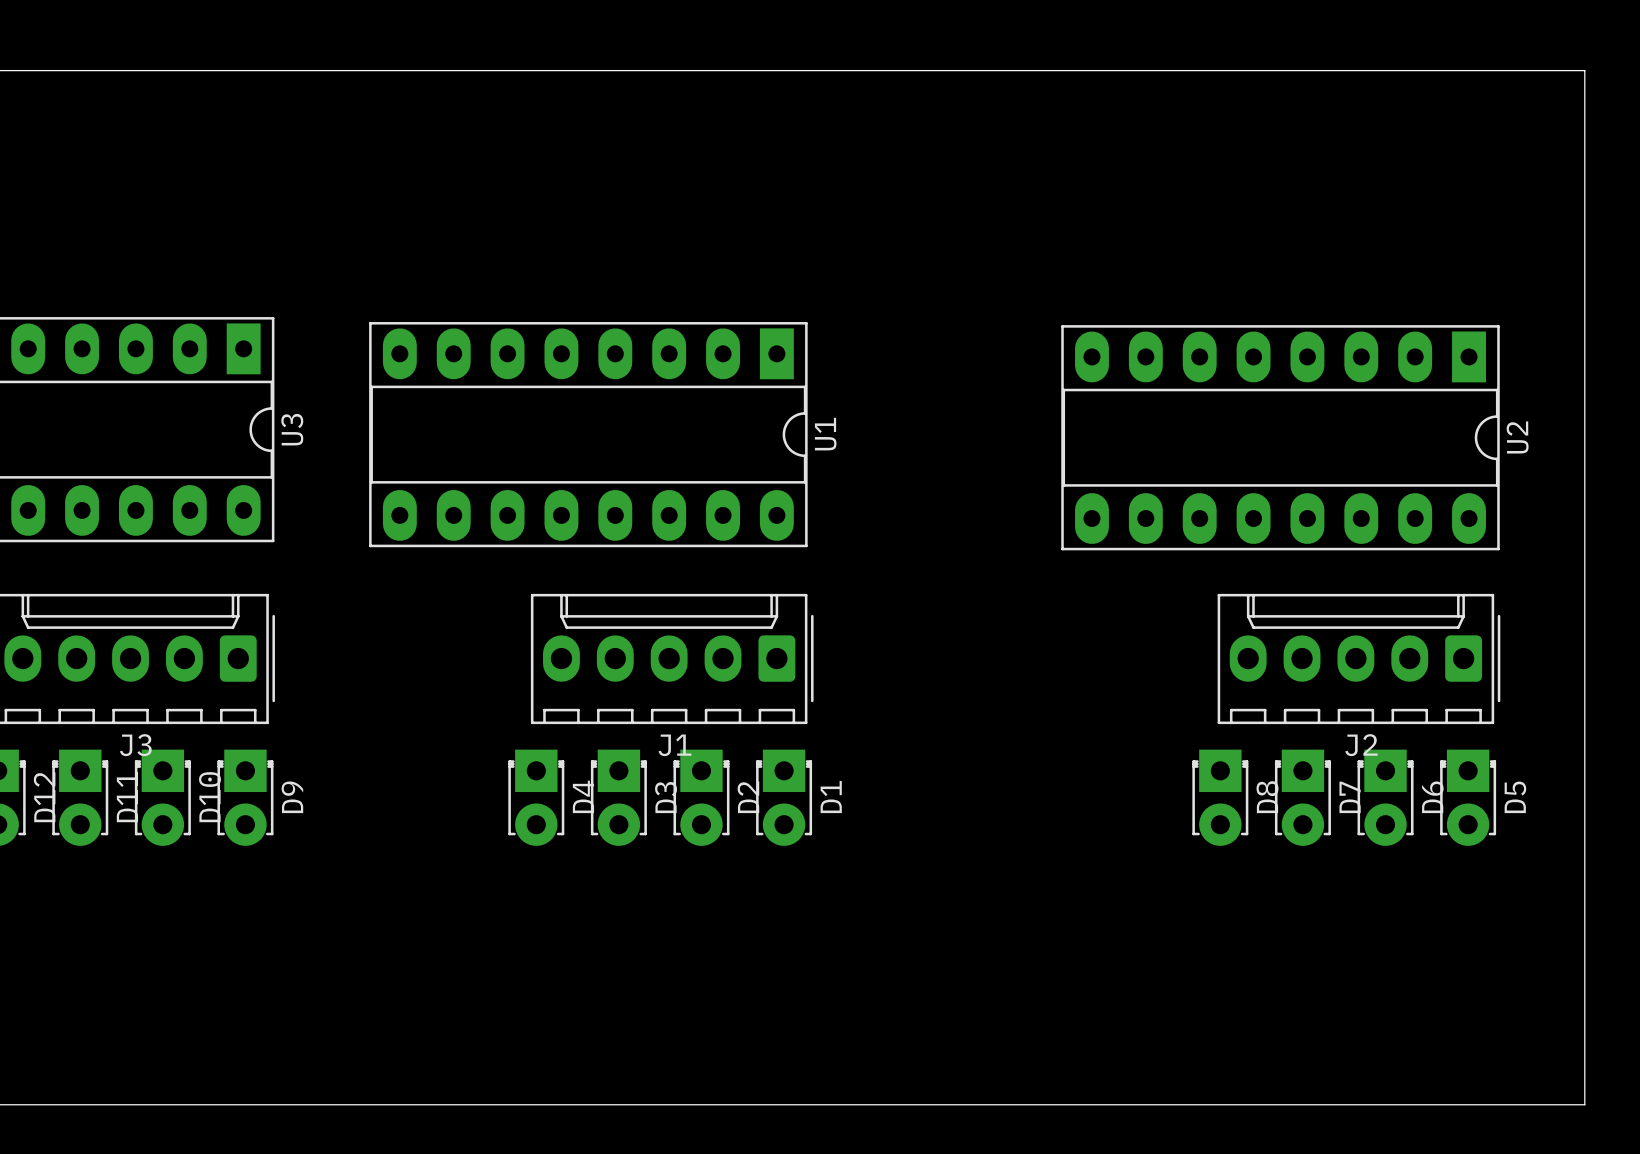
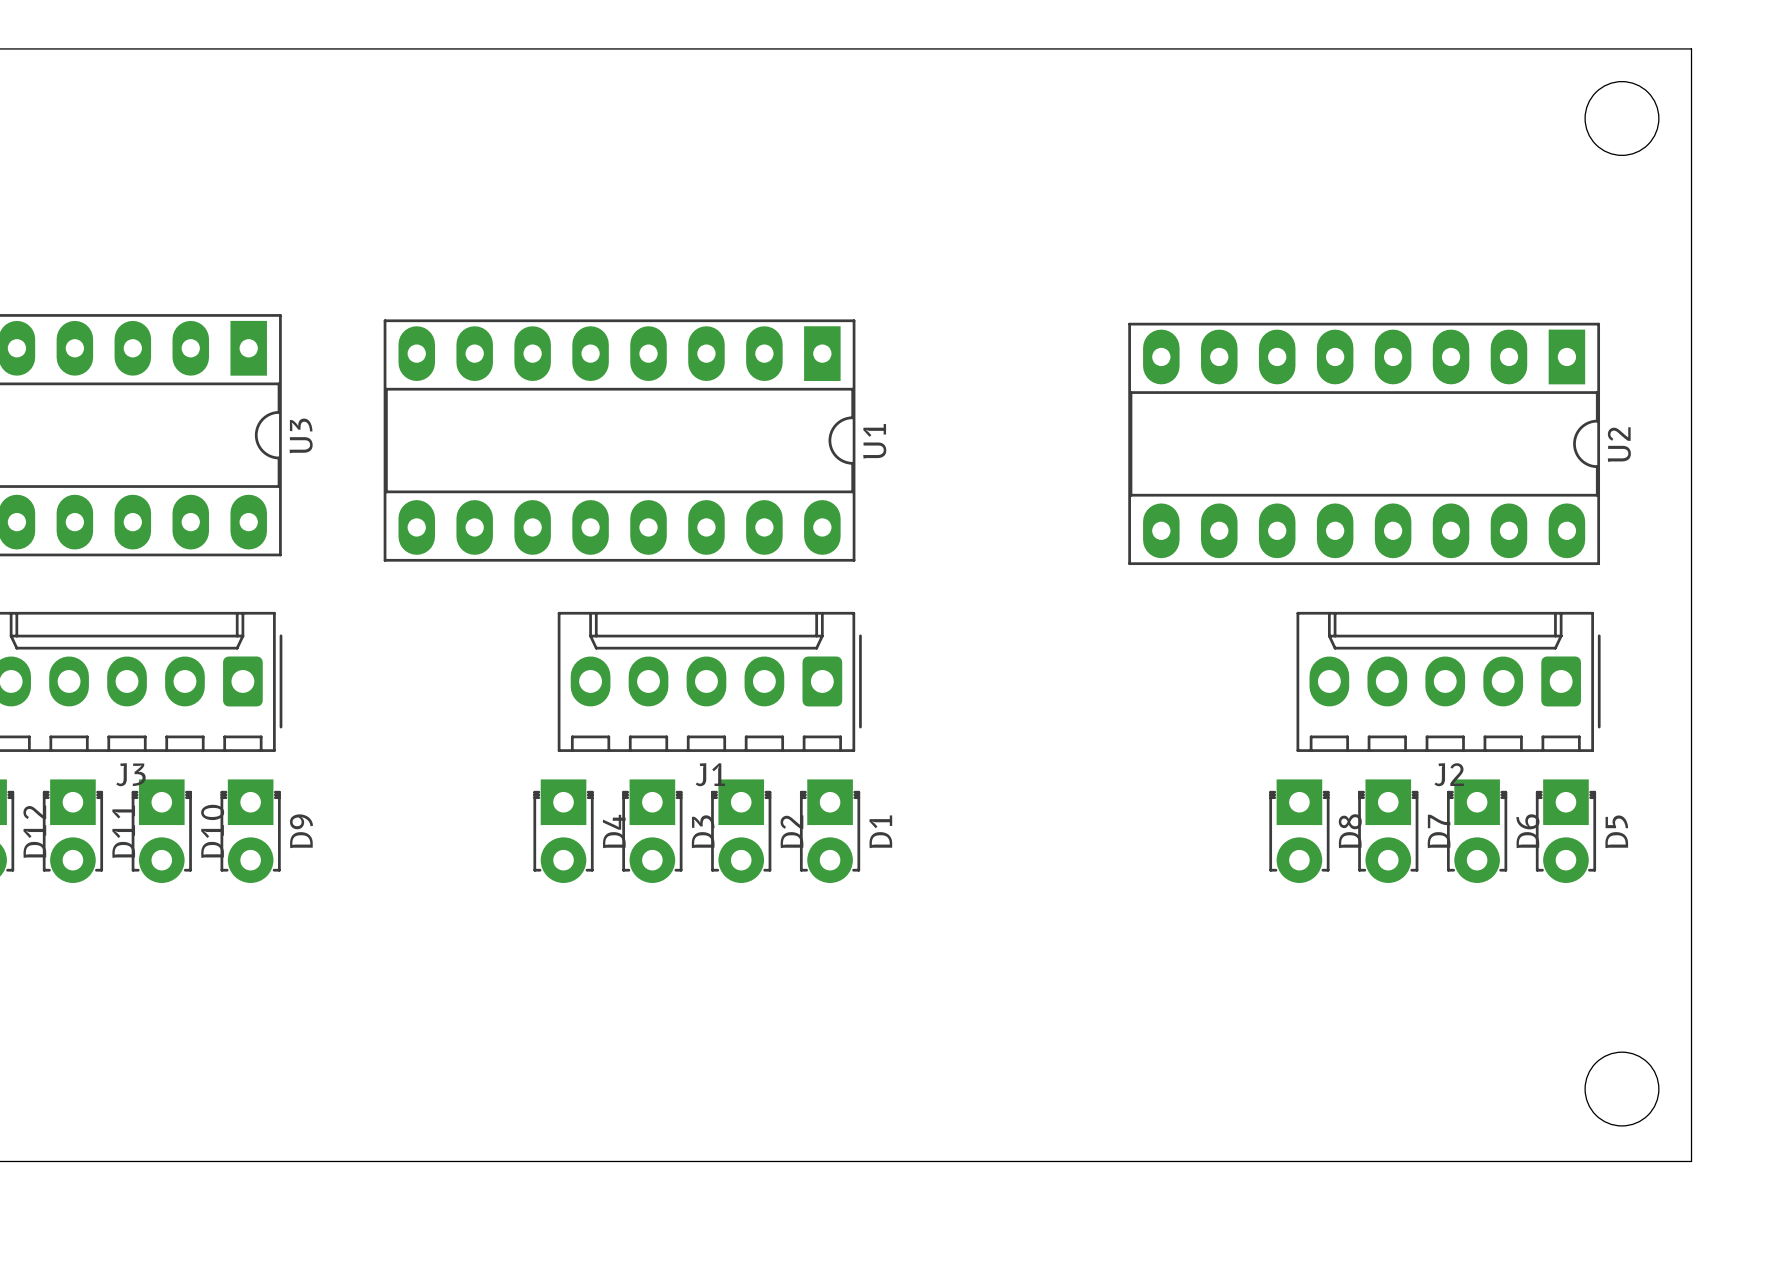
round board edge: none -> [1584, 81, 1660, 156]
round board edge: none -> [1584, 1051, 1660, 1127]

